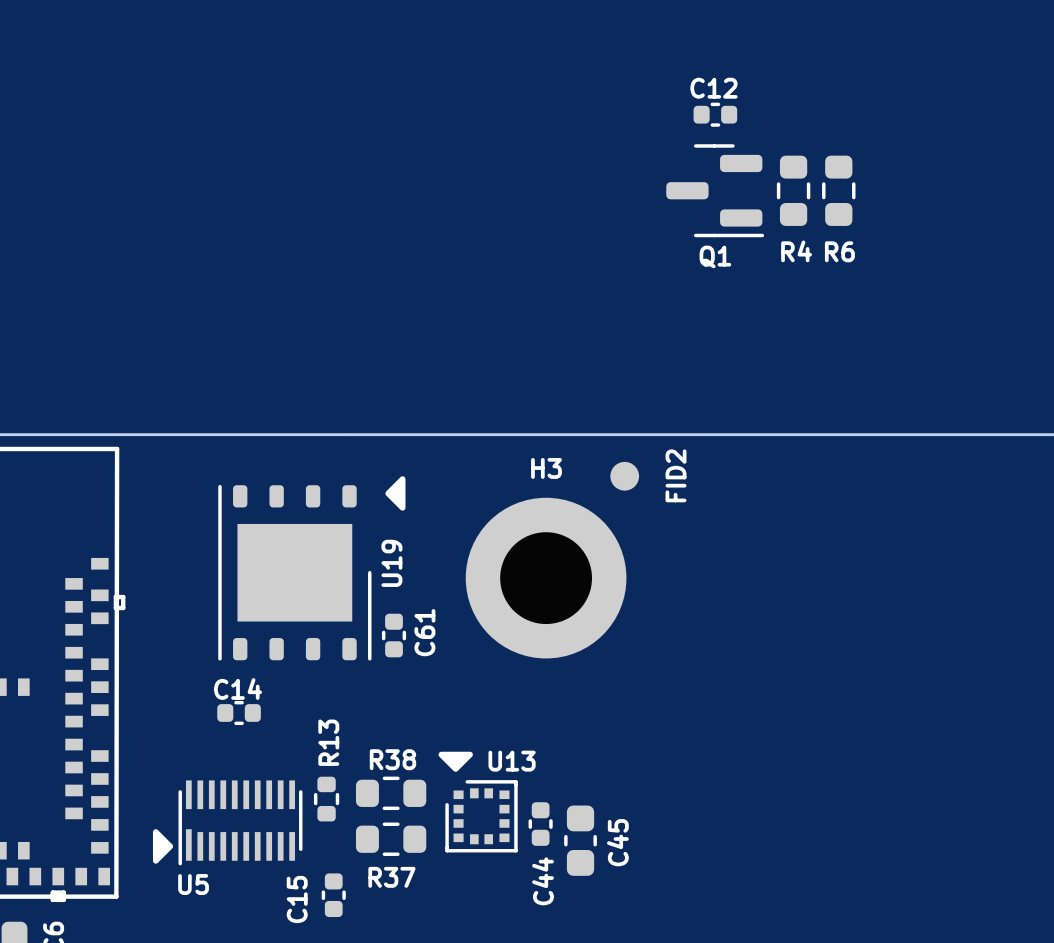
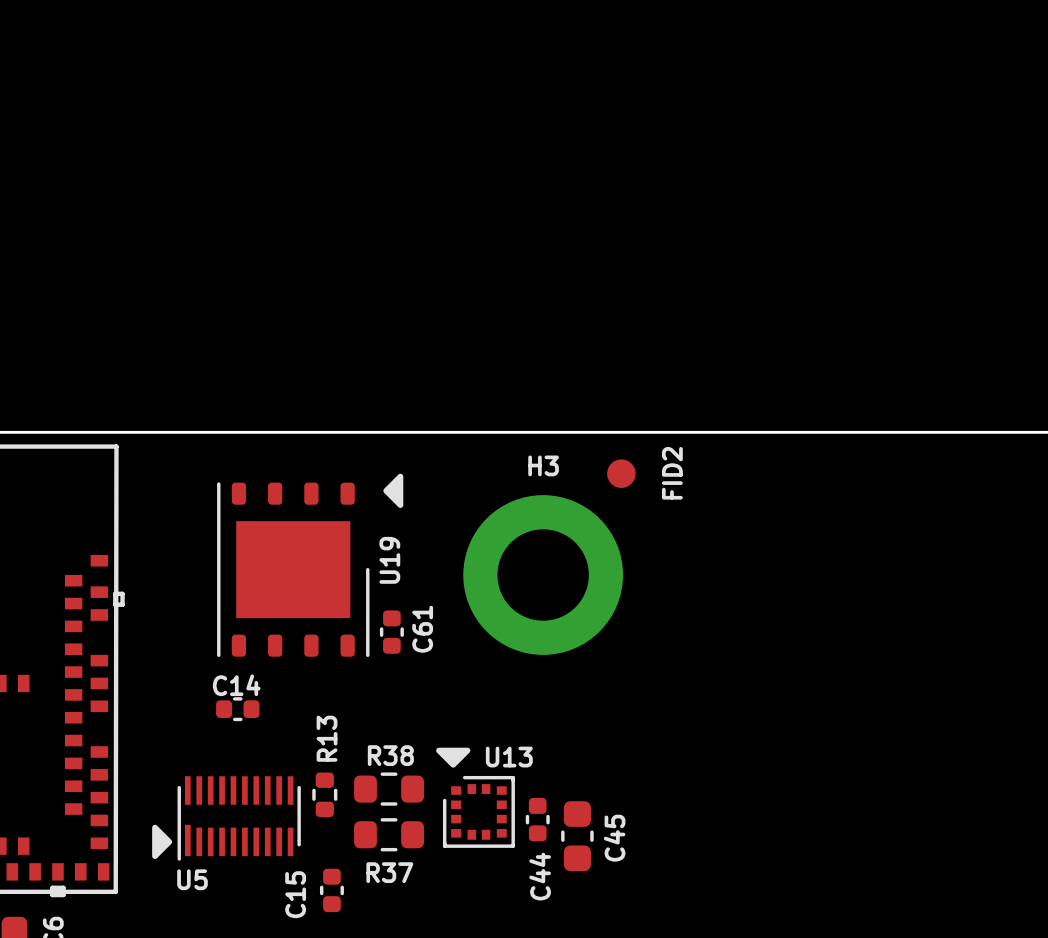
C12: (715, 114) -> none
Q1: (715, 190) -> none
R4: (793, 190) -> none
R6: (838, 190) -> none

